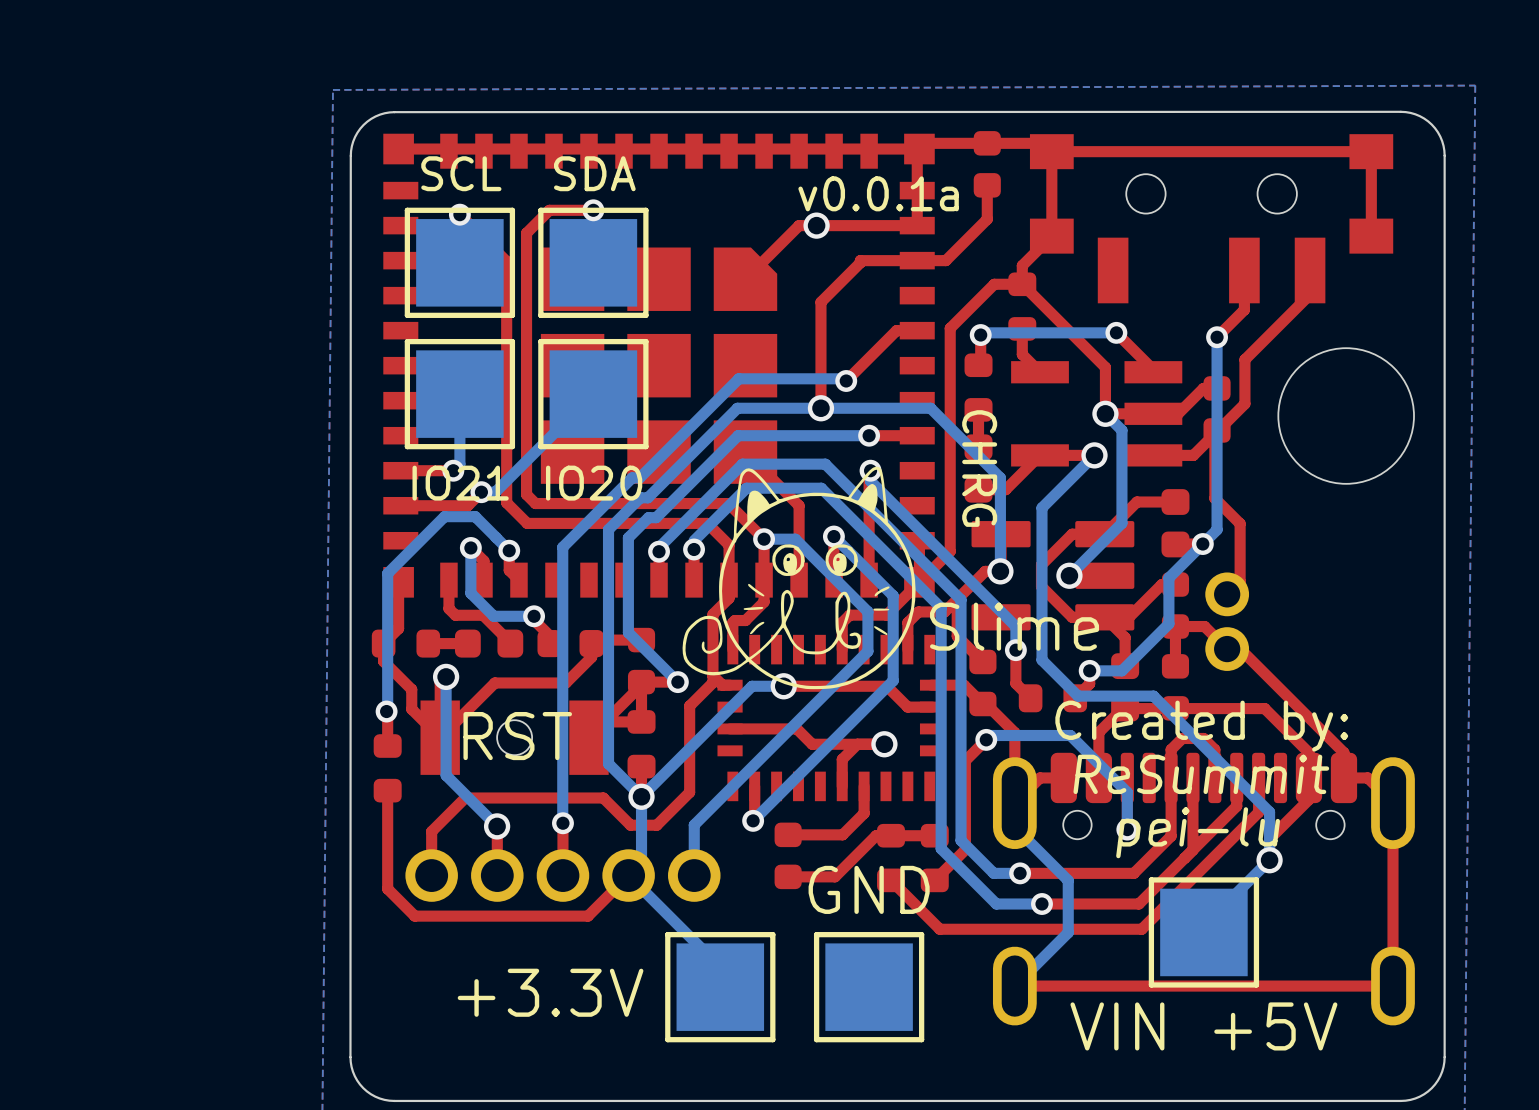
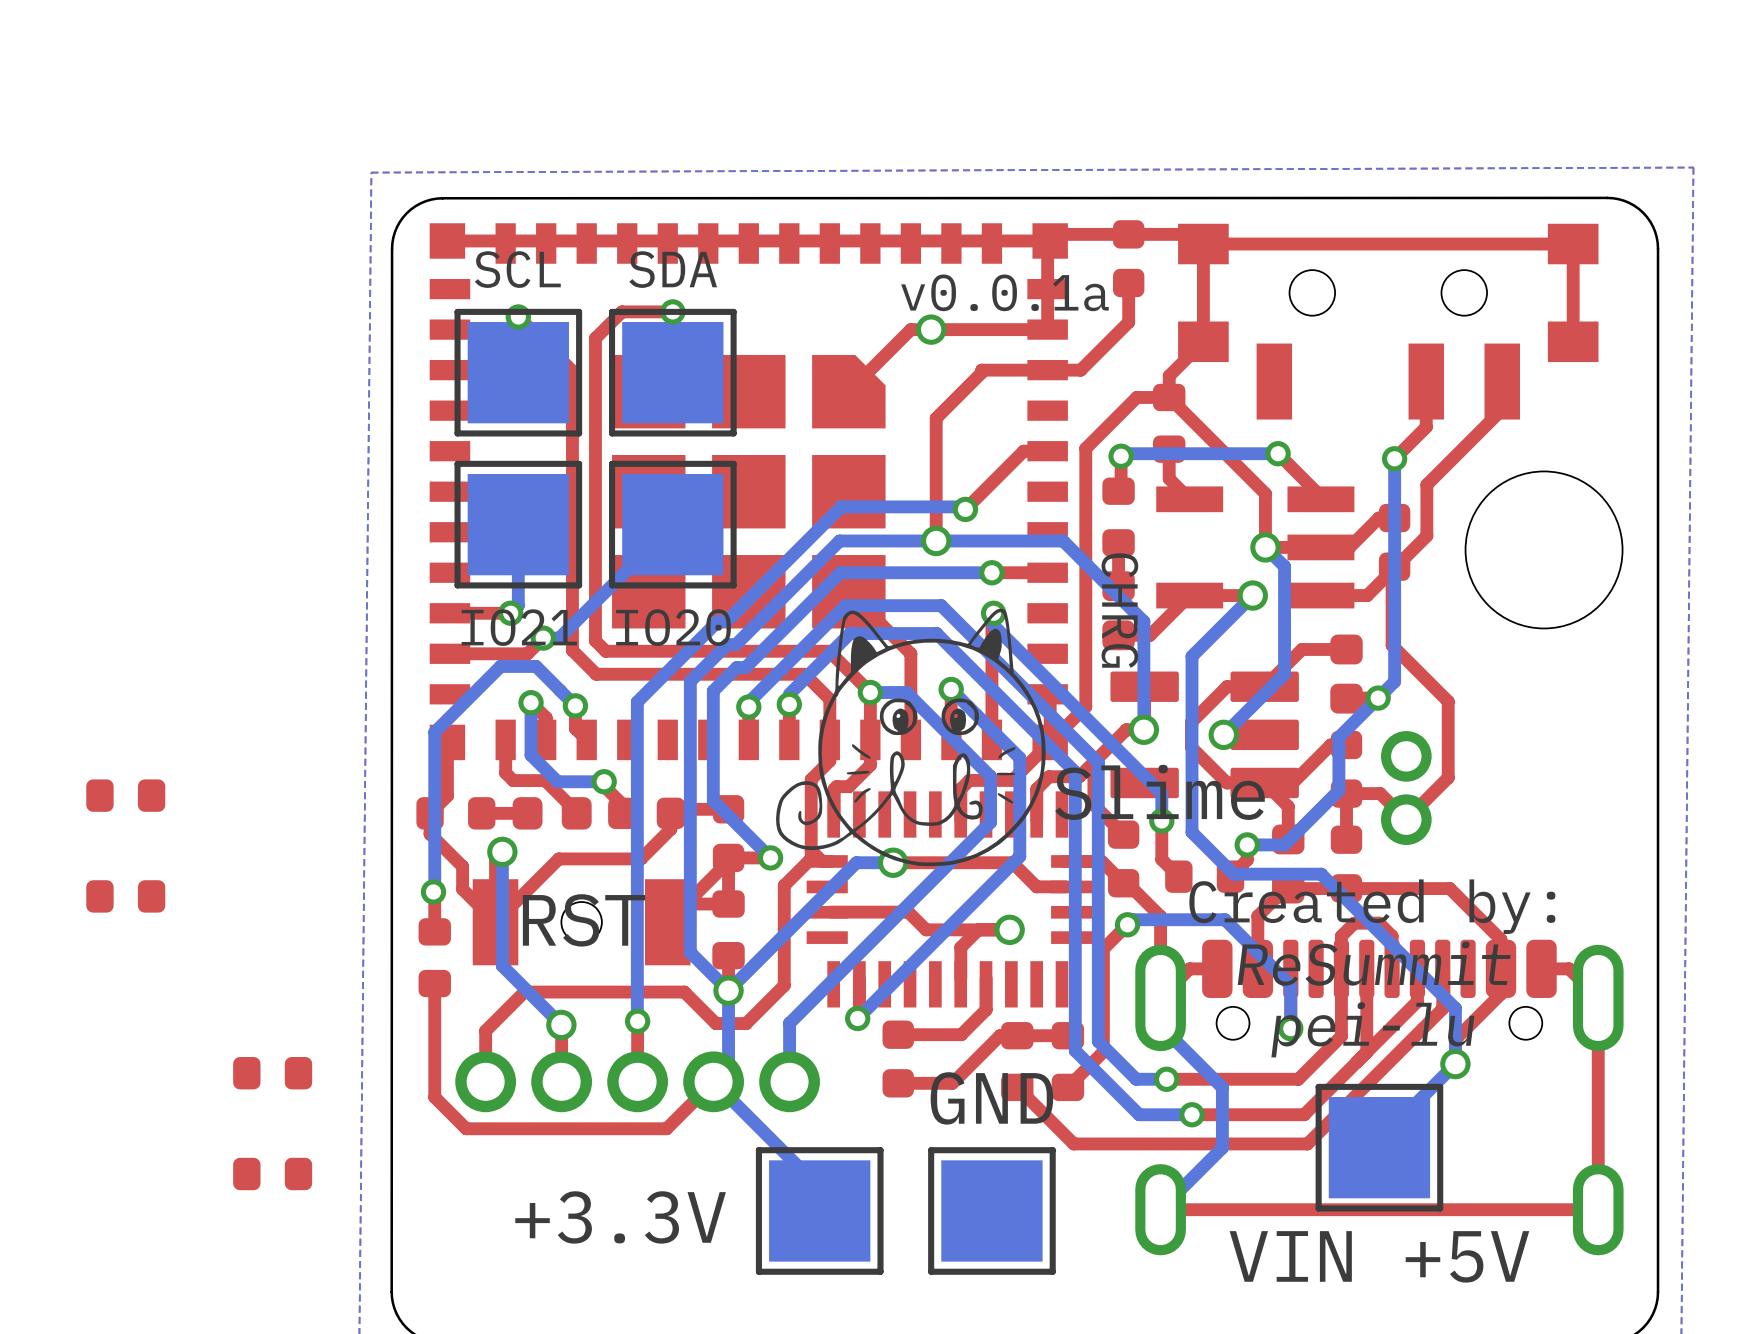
top track: (1240, 523) (1240, 581) (1227, 594) -> (1421, 674) (1448, 701) (1448, 777) (1422, 803)
part: none -> (125, 795)
part footprint: [717, 634, 946, 802] -> [806, 791, 1093, 1008]
top track: (1227, 649) (1240, 649) (1343, 752) (1343, 777) -> none
part: none -> (125, 896)
part: none -> (272, 1073)
part: none -> (272, 1174)

